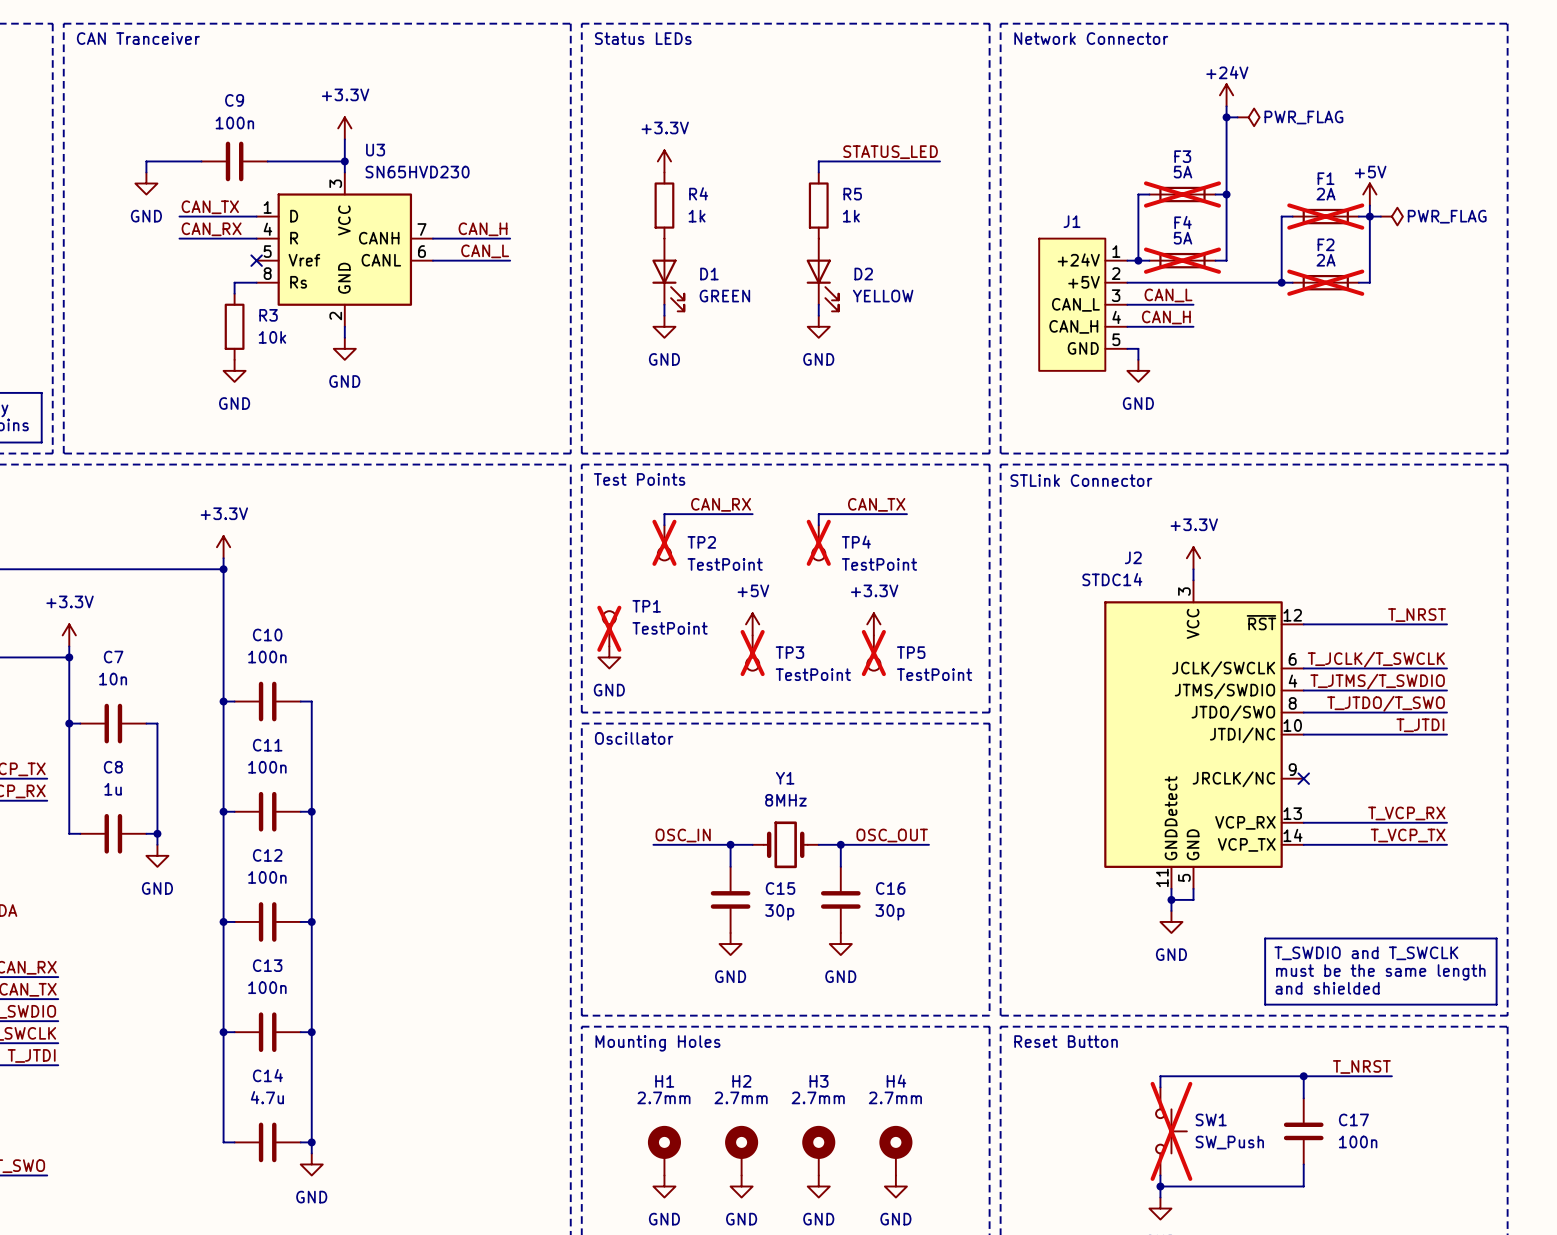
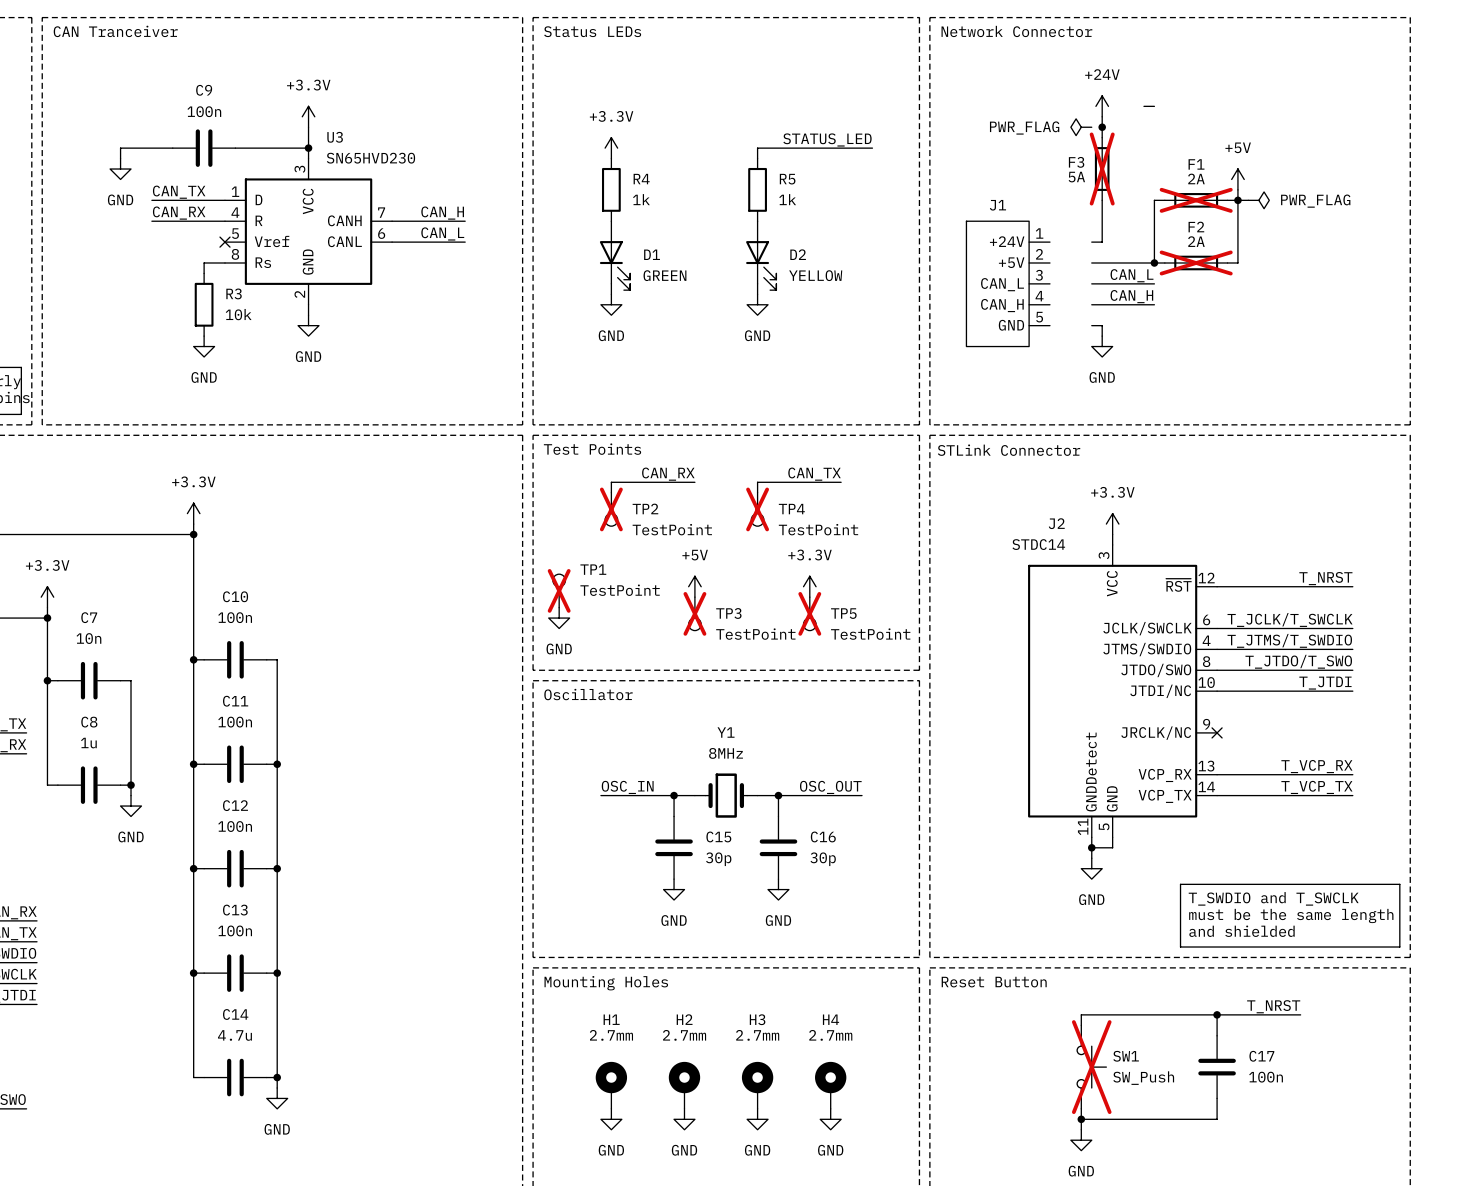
power symbol text position: +24V (1227, 72) -> +24V (1102, 74)
power symbol position: +24V (1226, 95) -> +24V (1102, 106)
wire: (1226, 106) (1226, 260) (1215, 260) -> none
junction: (1226, 117) -> none
power symbol: PWR_FLAG (1248, 117) -> none
wire: none -> (1102, 116) (1102, 137)
power symbol: none -> PWR_FLAG (1081, 127)
junction: none -> (1102, 127)
F3 name position: F3 (1182, 156) -> F3 (1076, 162)
F3 value position: 5A (1183, 172) -> 5A (1076, 177)
power symbol text position: +5V (1370, 172) -> +5V (1238, 147)
wire: (1149, 194) (1138, 194) (1138, 260) -> none
F3 rotation: 0° (1182, 194) -> 90° clockwise (1102, 169)
wire: (1215, 194) (1226, 194) -> none
junction: (1226, 194) -> none
power symbol position: +5V (1369, 194) -> +5V (1237, 179)
wire: (1369, 205) (1369, 282) (1358, 282) -> (1237, 189) (1237, 262) (1227, 262)
wire: none -> (1102, 200) (1102, 242) (1091, 242)
wire: (1292, 216) (1281, 216) (1281, 282) -> (1164, 200) (1154, 200) (1154, 262)
junction: none -> (1237, 200)
F1 position: (1325, 216) -> (1196, 200)
junction: (1369, 216) -> none
power symbol position: PWR_FLAG (1391, 216) -> PWR_FLAG (1258, 200)
power symbol text position: PWR_FLAG (1447, 216) -> PWR_FLAG (1315, 201)
wire: (1127, 260) (1149, 260) -> none
junction: (1138, 260) -> none
F4: 5A (1182, 260) -> none
wire: (1127, 282) (1171, 282) -> none
junction: none -> (1154, 262)
junction: (1281, 282) -> none
F2 position: (1325, 282) -> (1196, 262)
label position: CAN_L (1168, 295) -> CAN_L (1132, 275)
wire: (1127, 304) (1171, 304) -> (1112, 283) (1154, 283)
label position: CAN_H (1166, 317) -> CAN_H (1131, 296)
wire: (1127, 326) (1171, 326) -> (1112, 304) (1154, 304)
wire: (1127, 348) (1138, 348) (1138, 359) -> (1091, 325) (1102, 325) (1102, 336)
power symbol position: GND (1138, 370) -> GND (1102, 346)

